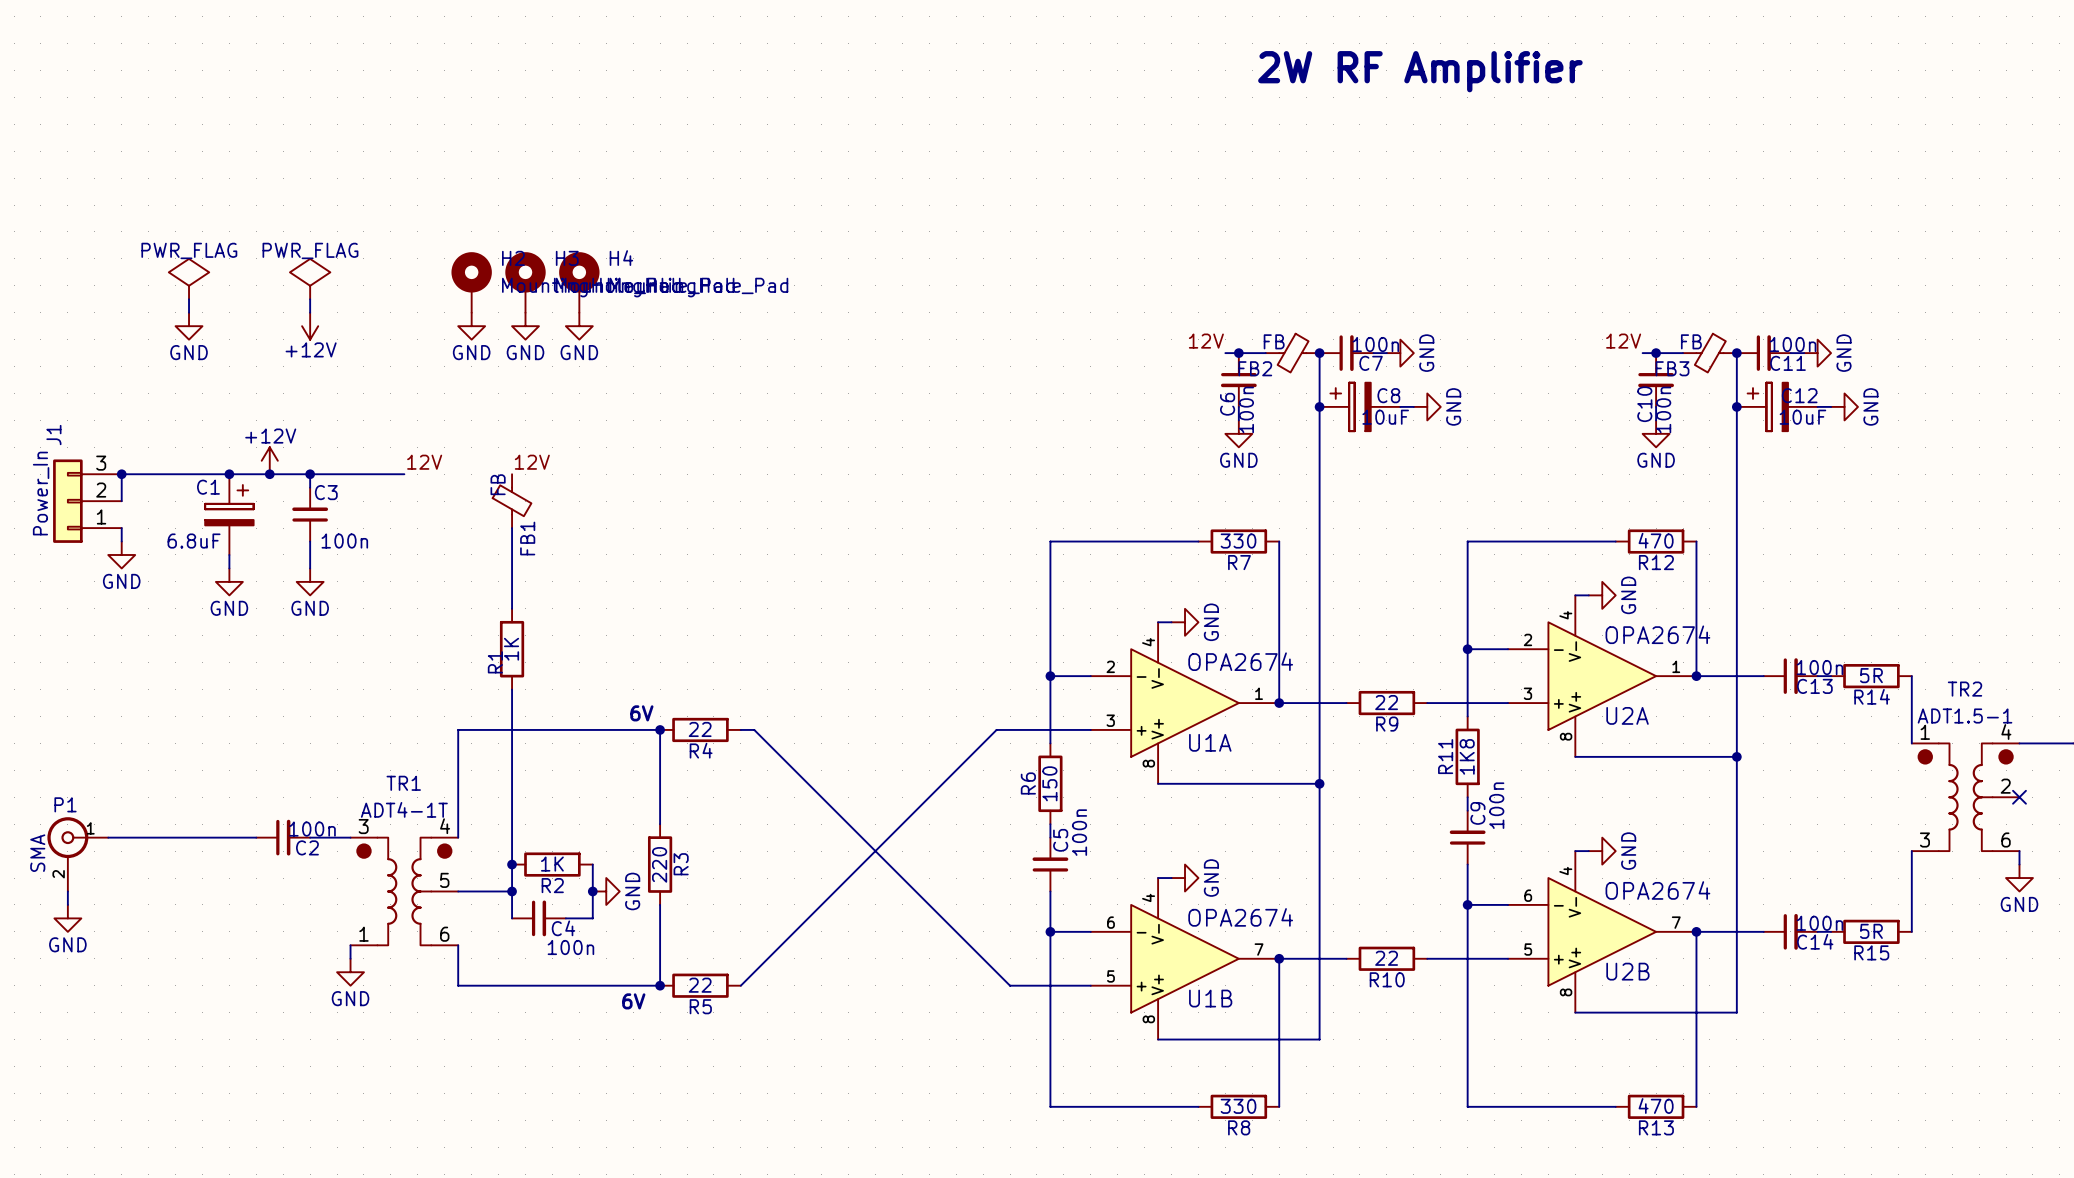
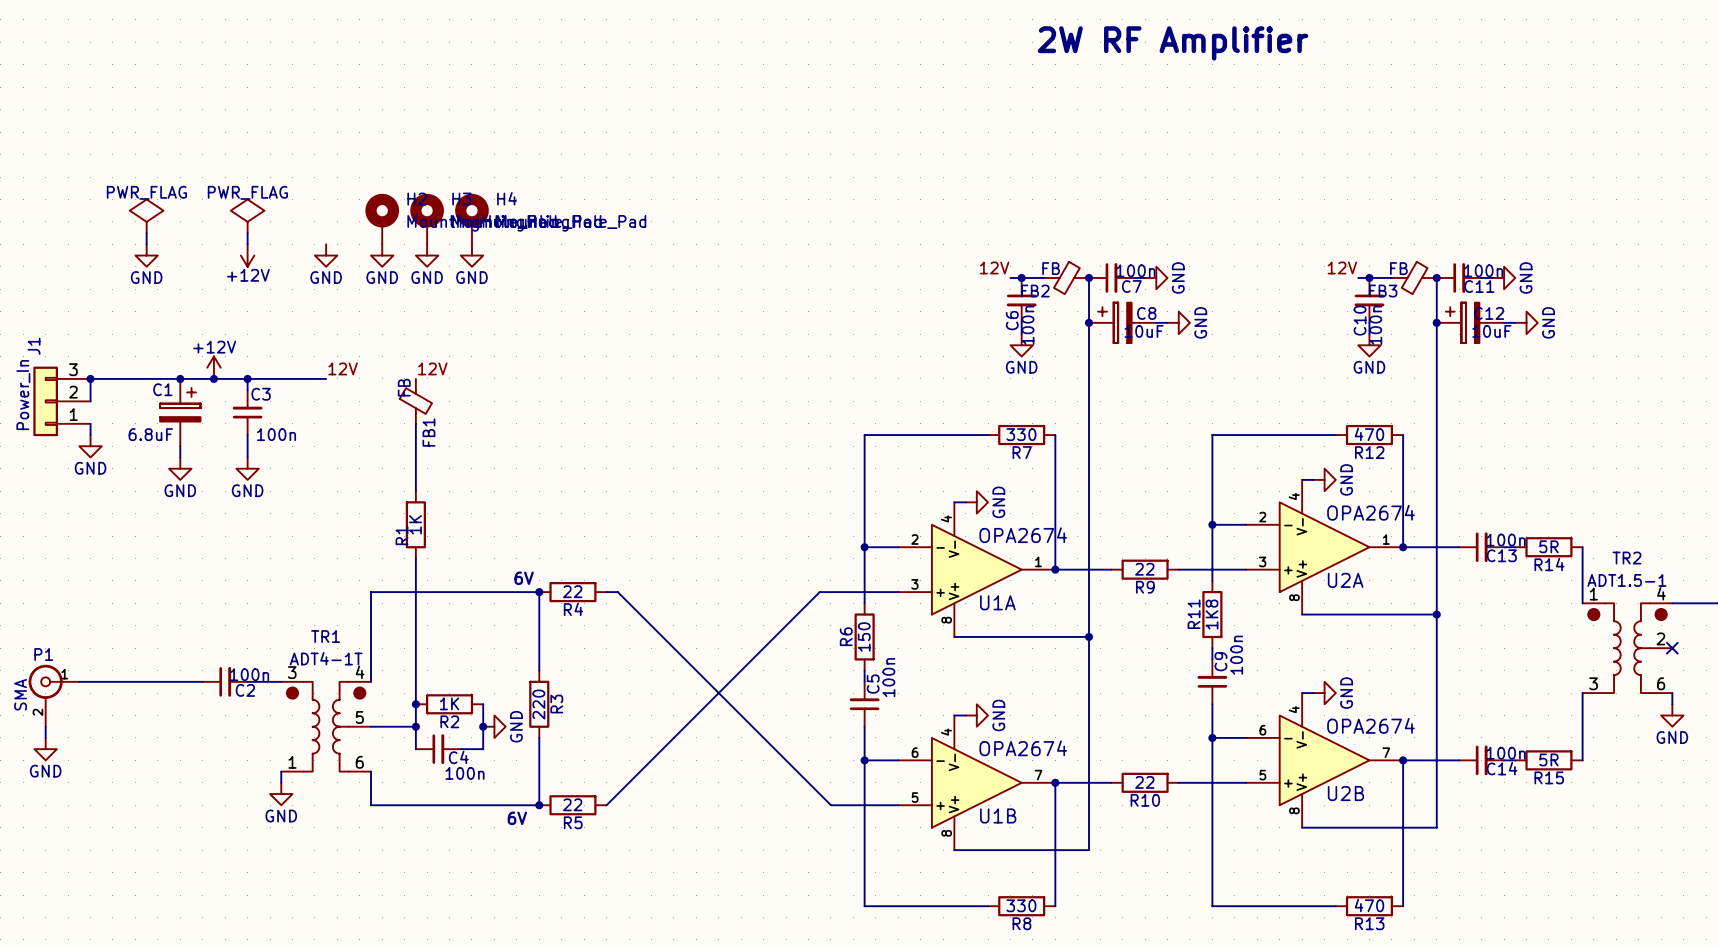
power symbol: none -> GND (326, 255)

